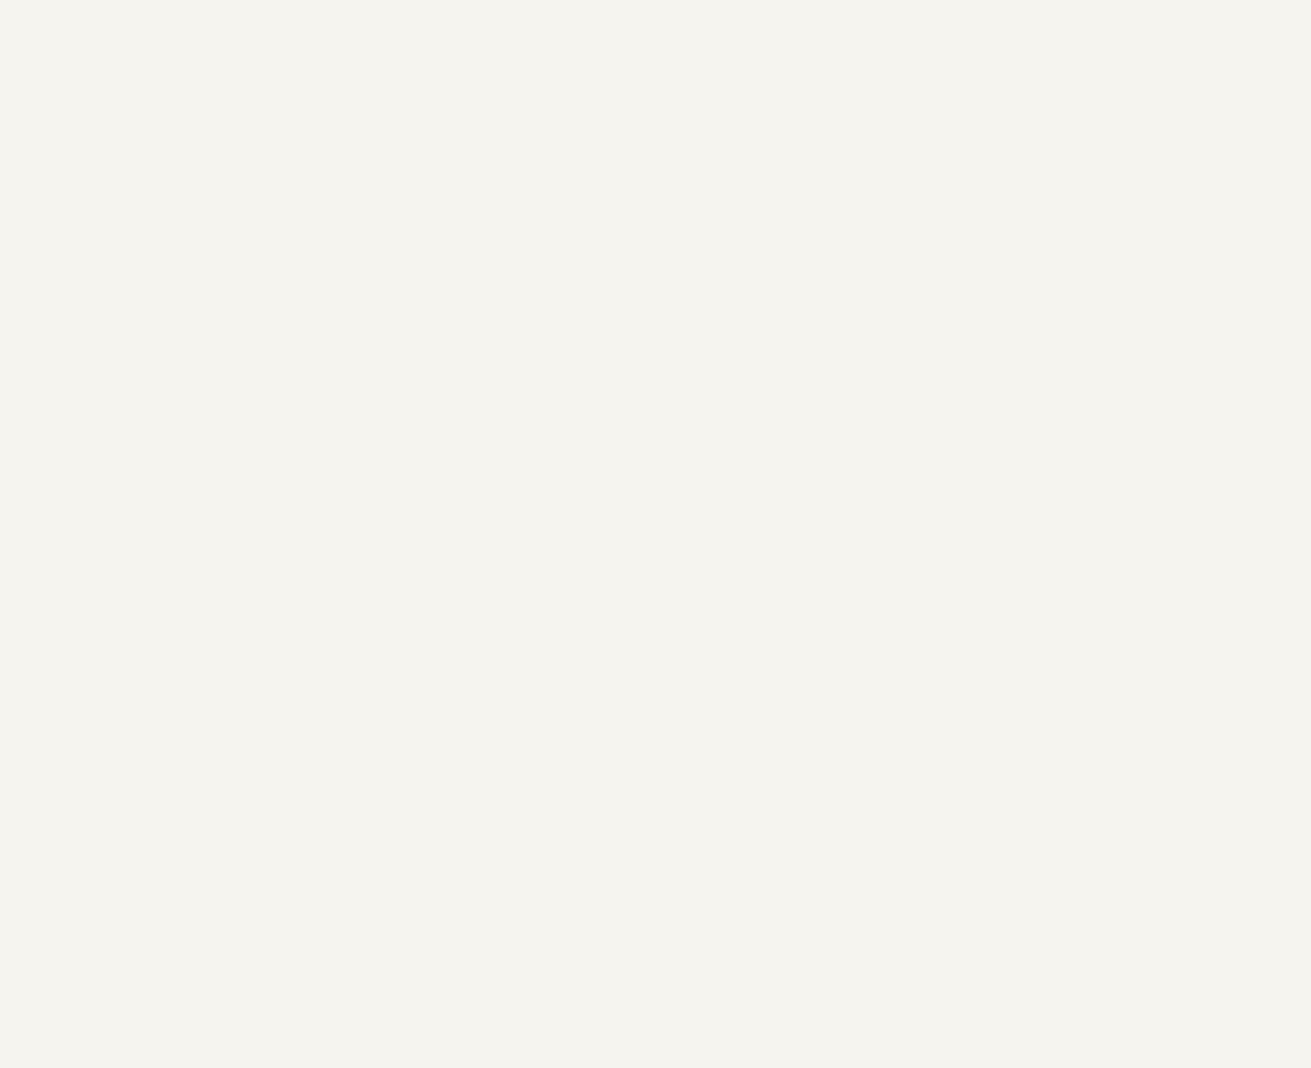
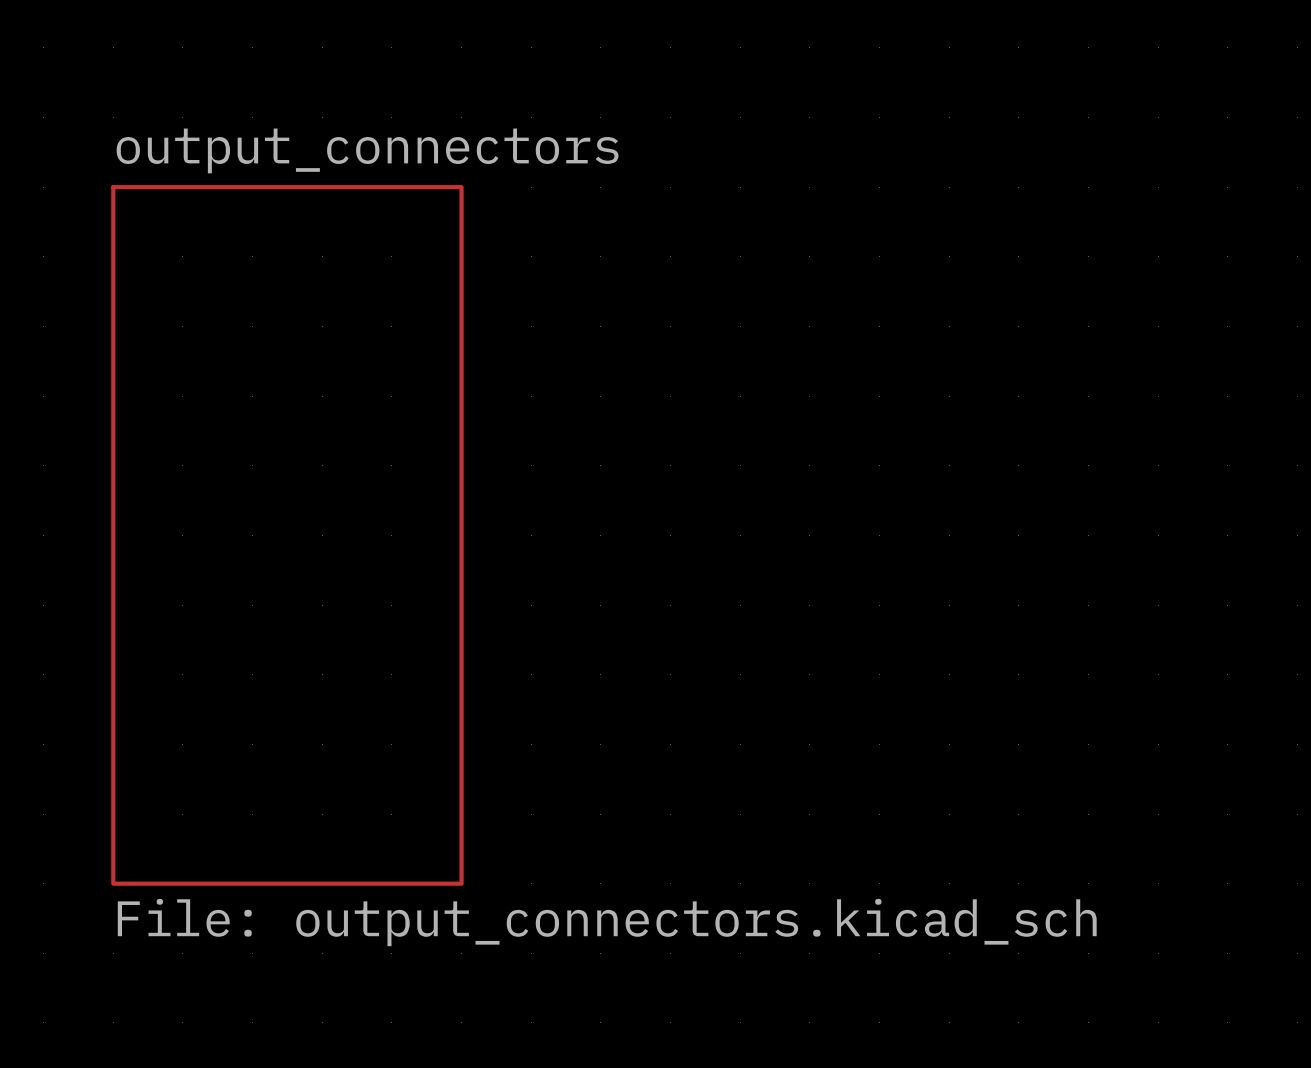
sheet output_connectors: none -> File: output_connectors.kicad_sch (287, 535)

